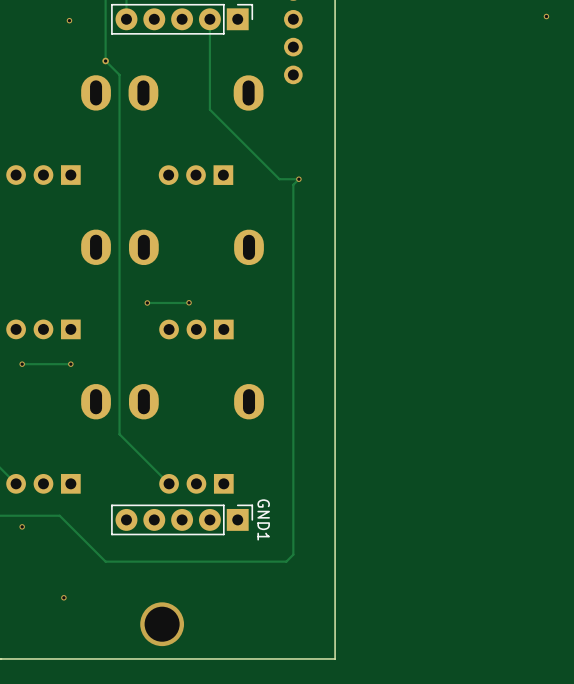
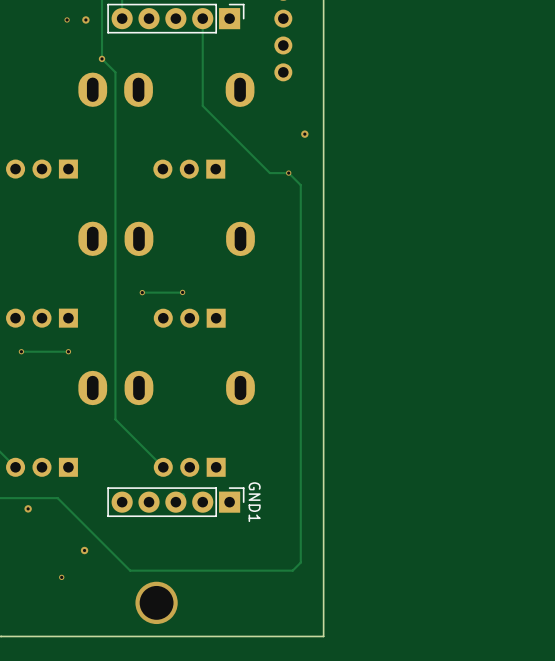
via: (546, 16) -> none
via: none -> (85, 19)
via: none -> (304, 134)
track: (298, 179) (293, 184) (293, 554) (286, 561) (105, 561) -> (288, 173) (300, 185) (300, 562) (292, 570) (130, 570) (102, 542)
via: (22, 526) -> none
via: none -> (28, 508)
via: none -> (84, 550)

